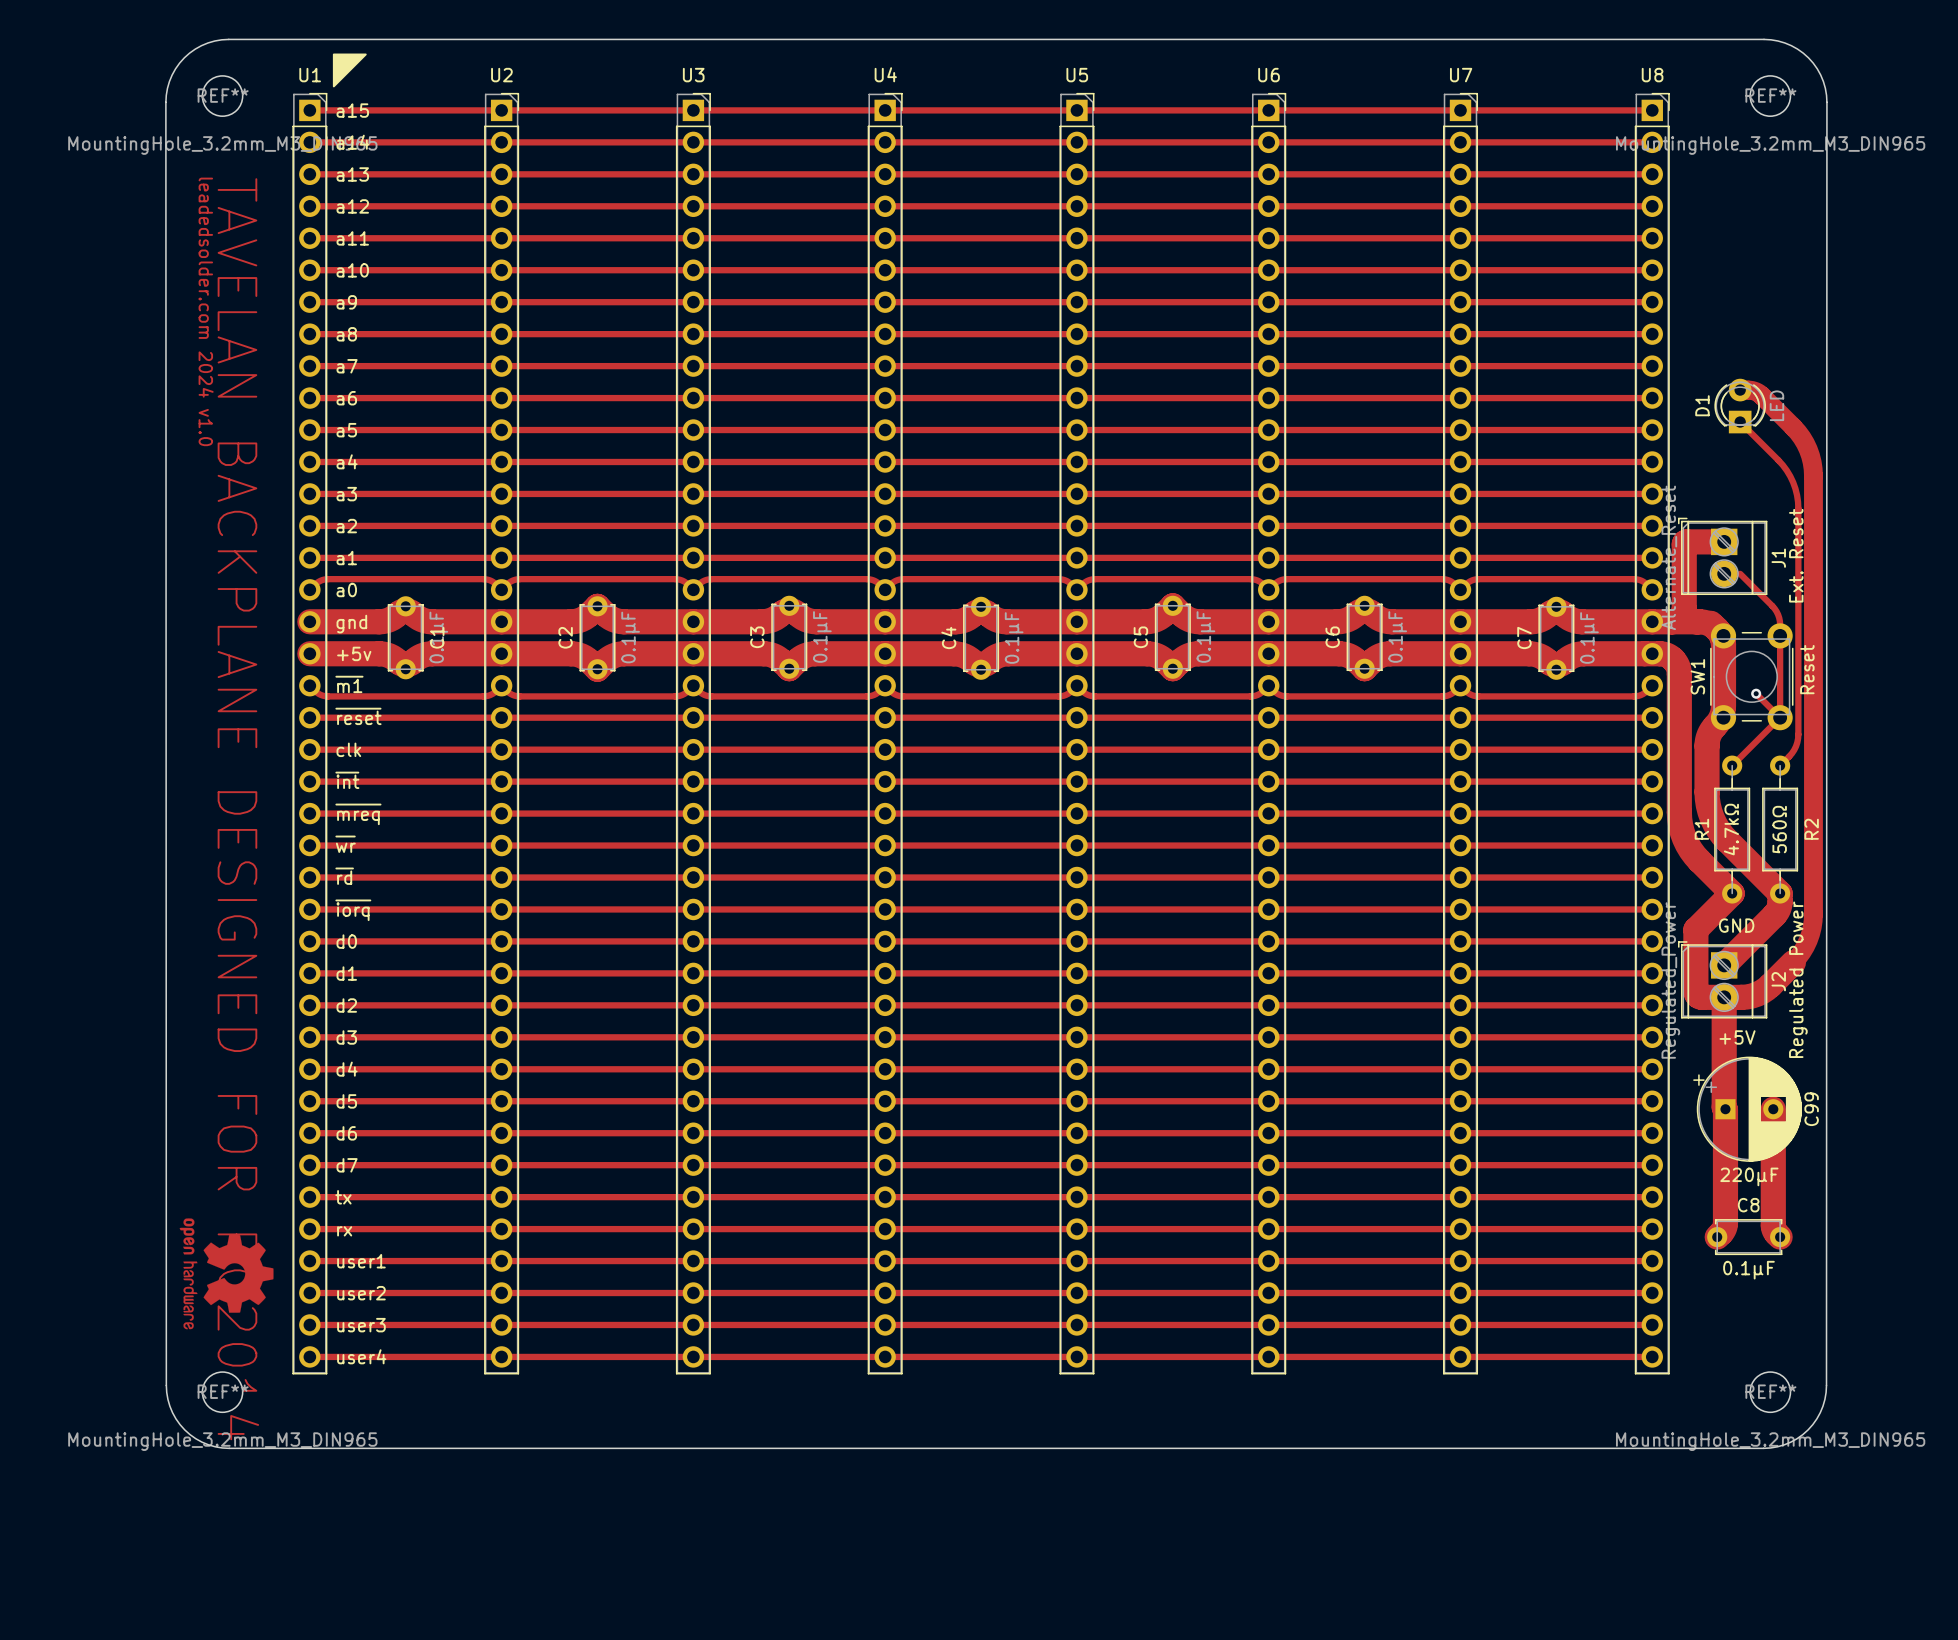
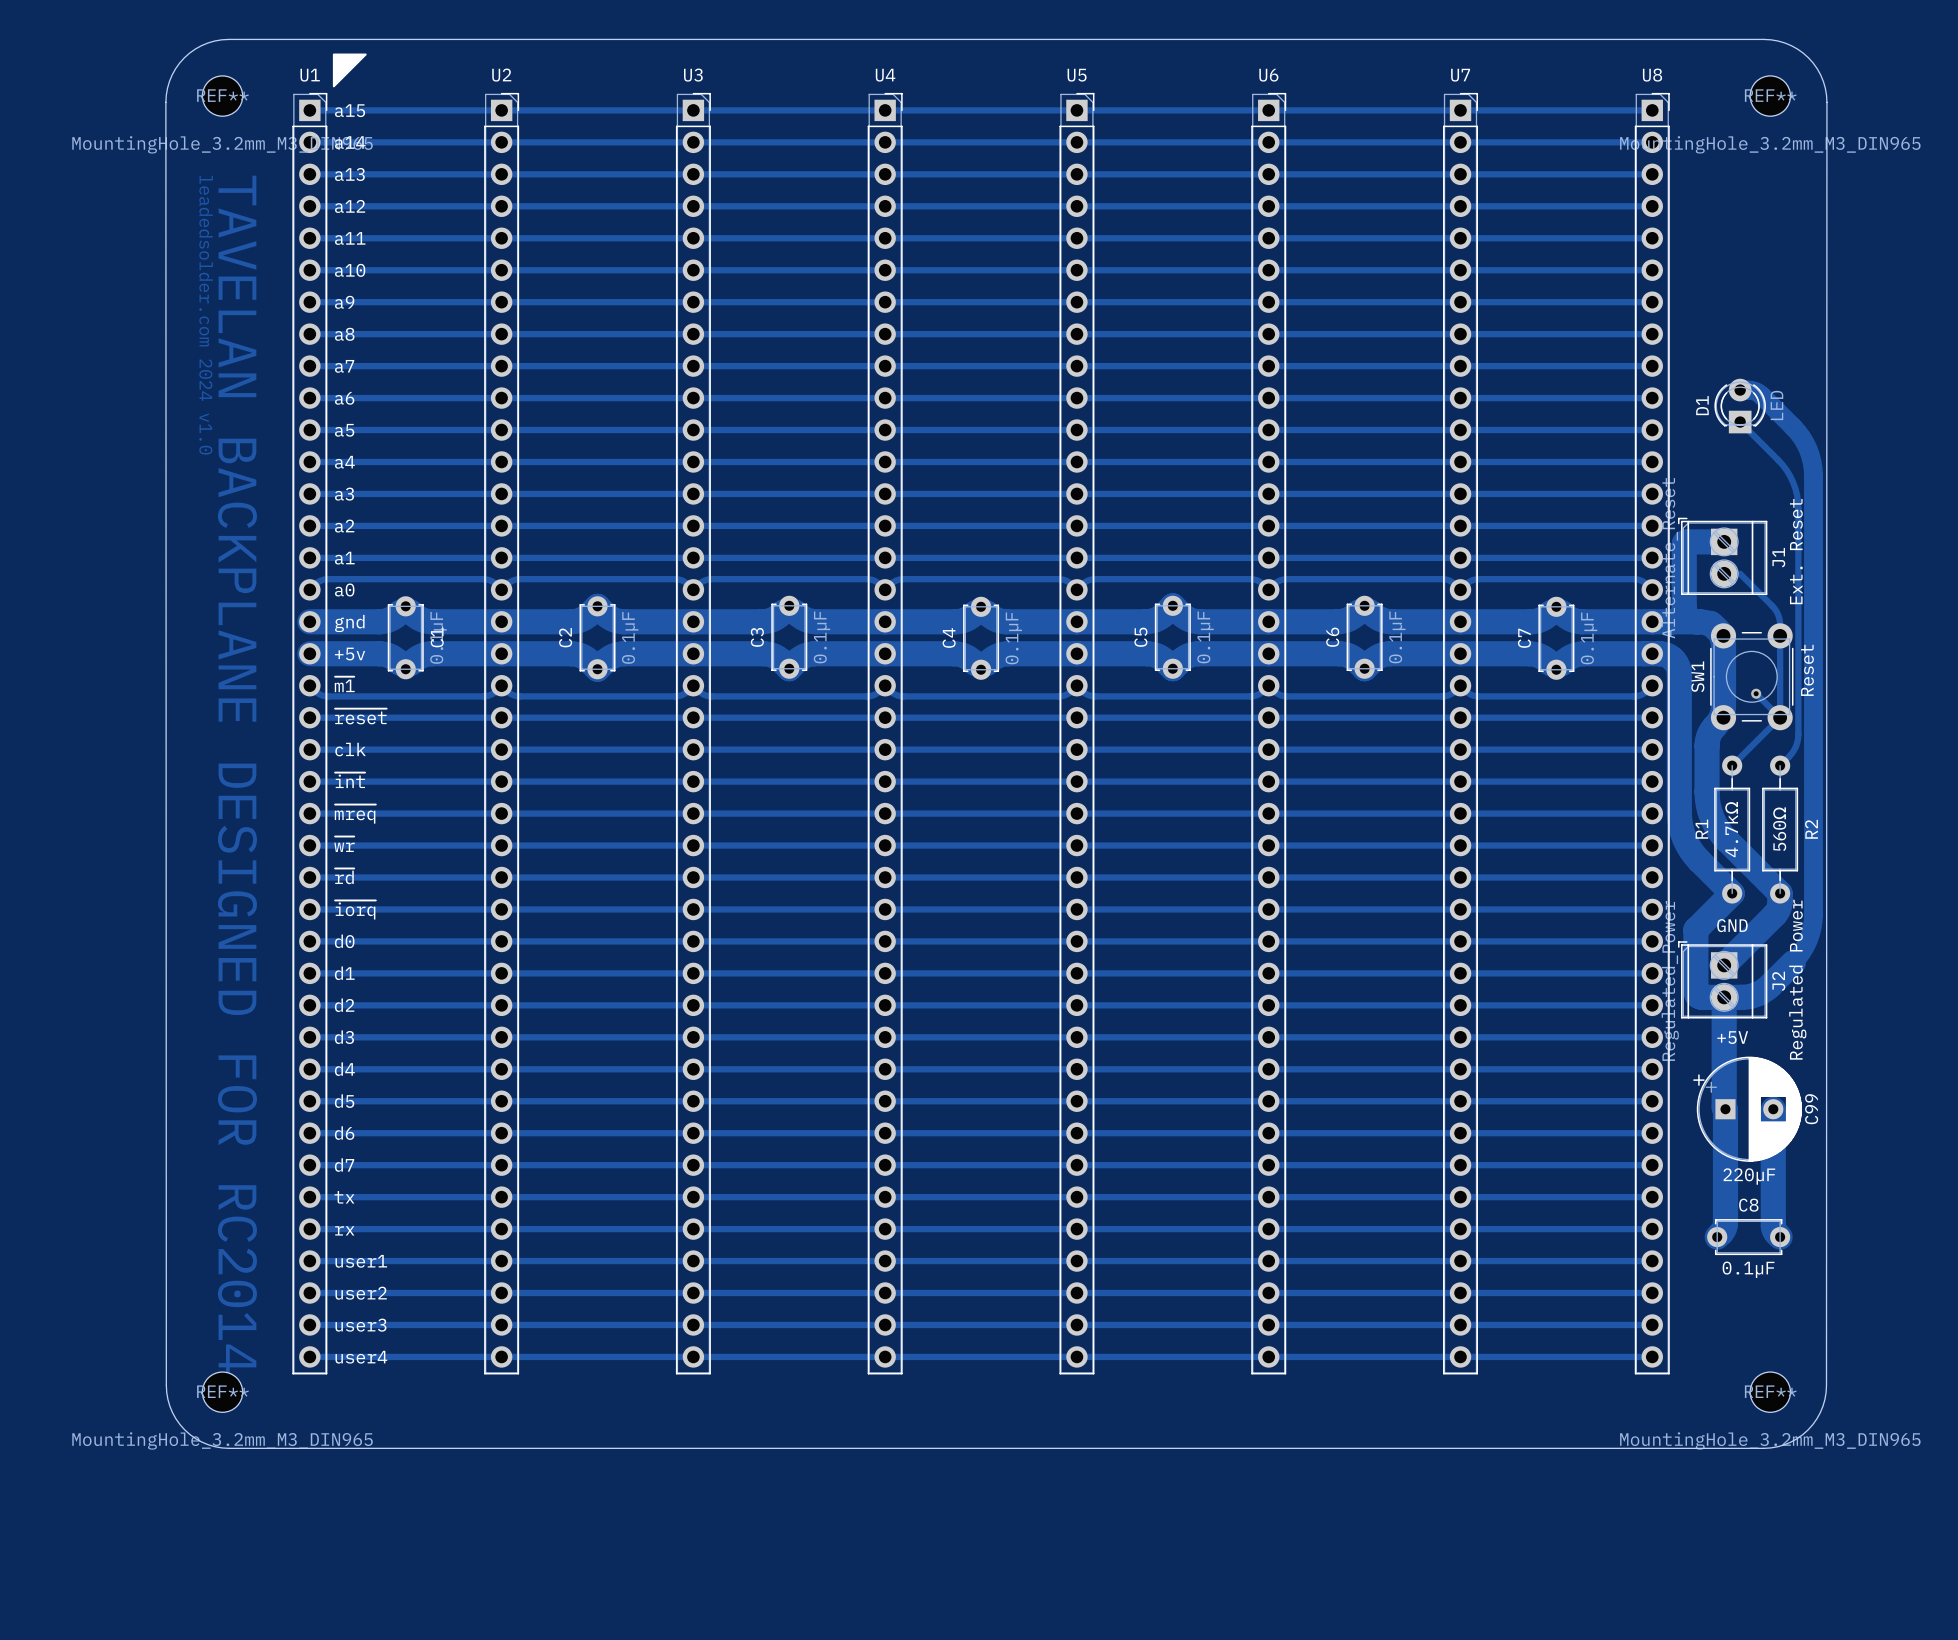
drawing: [179, 1218, 274, 1330] -> none

